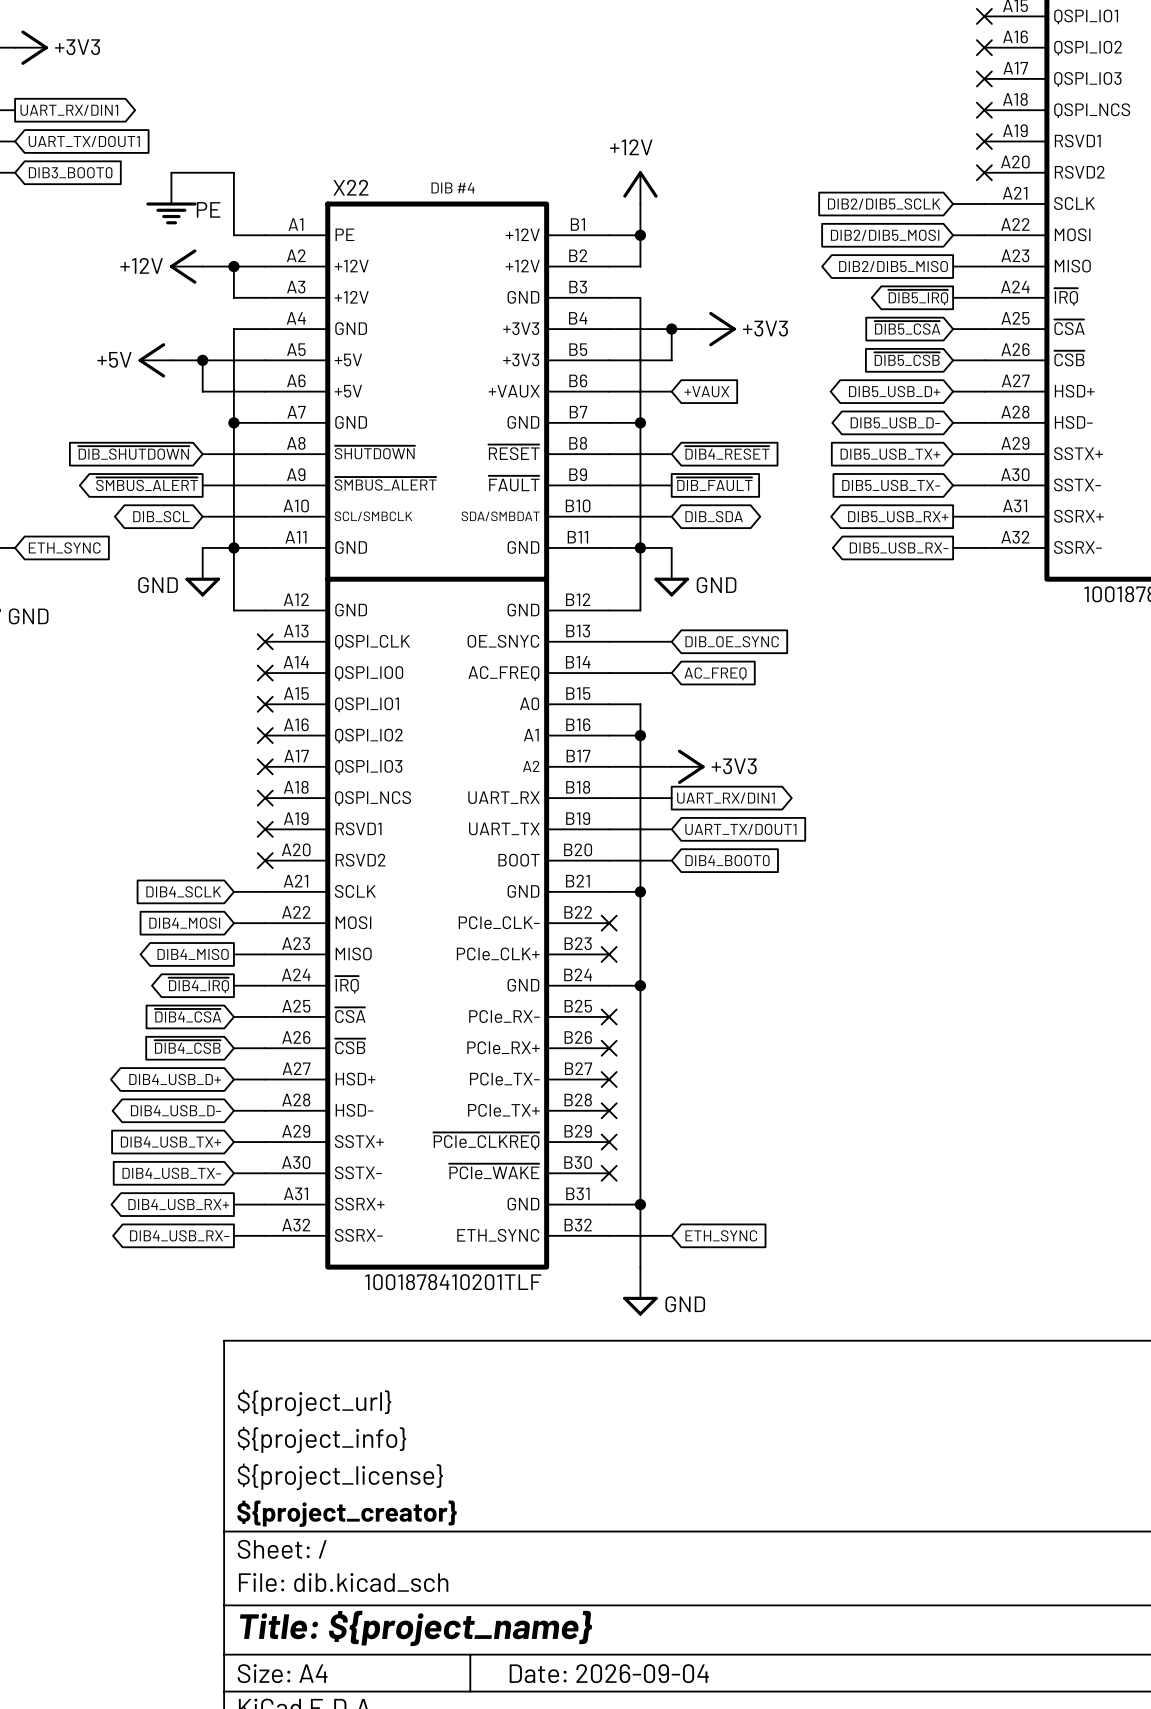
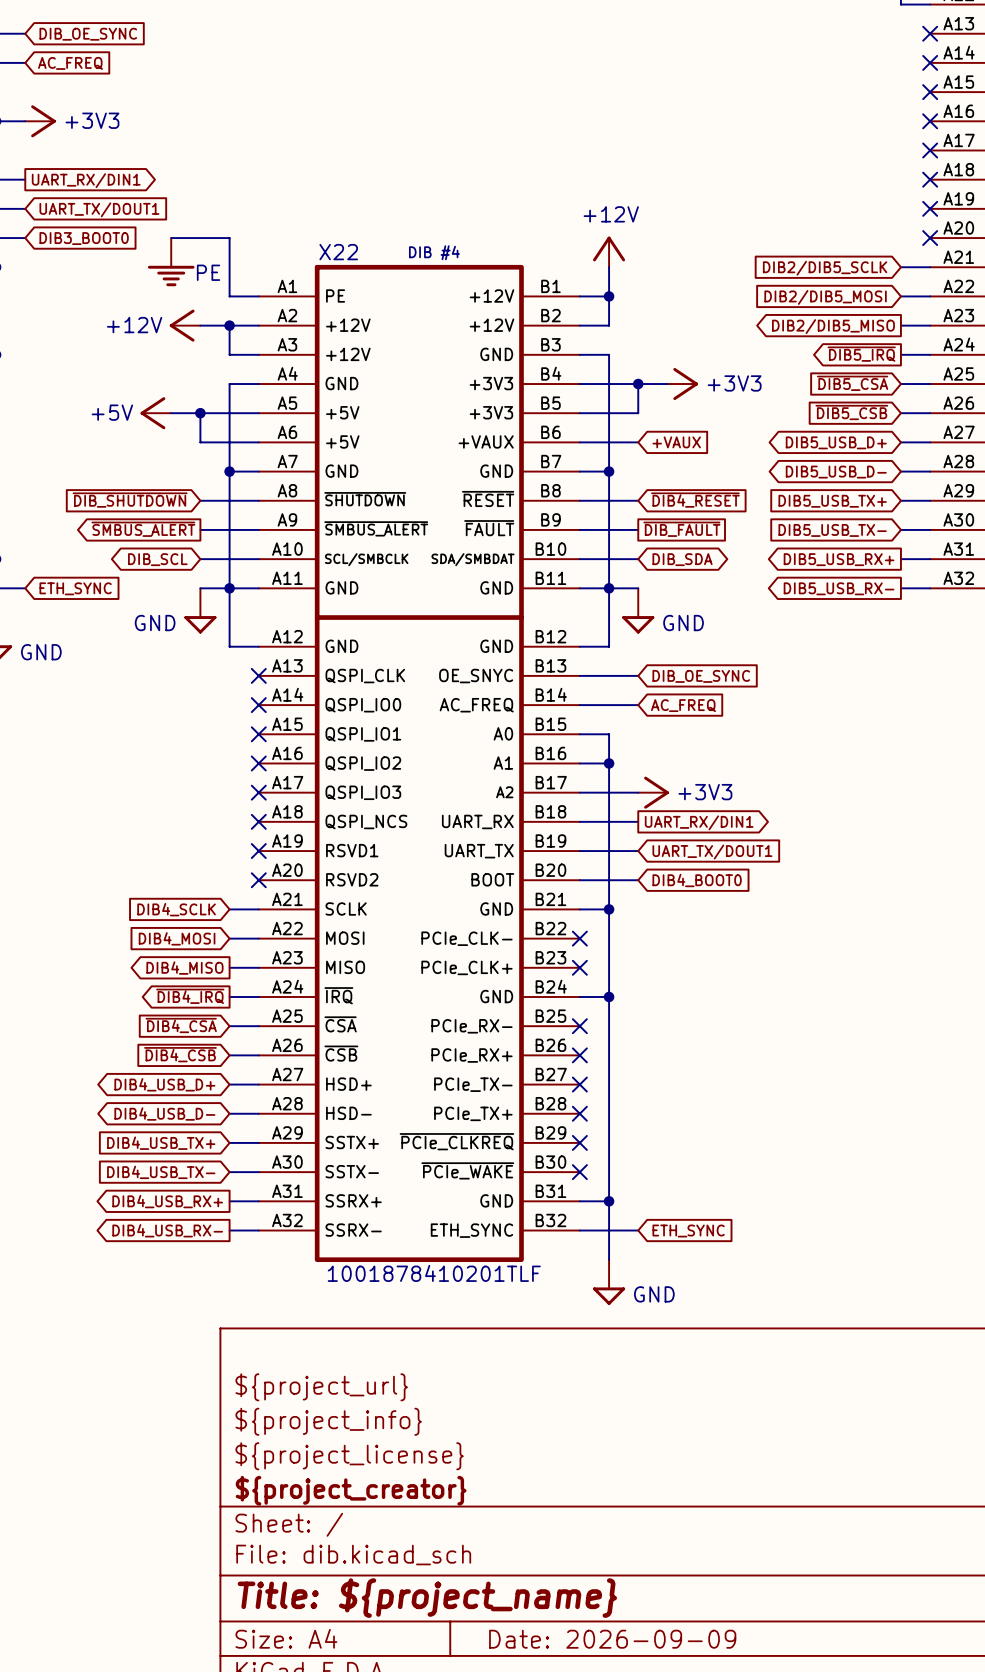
title block: Date: 2026-09-04 (609, 1673) -> Date: 2026-09-09 (612, 1639)

